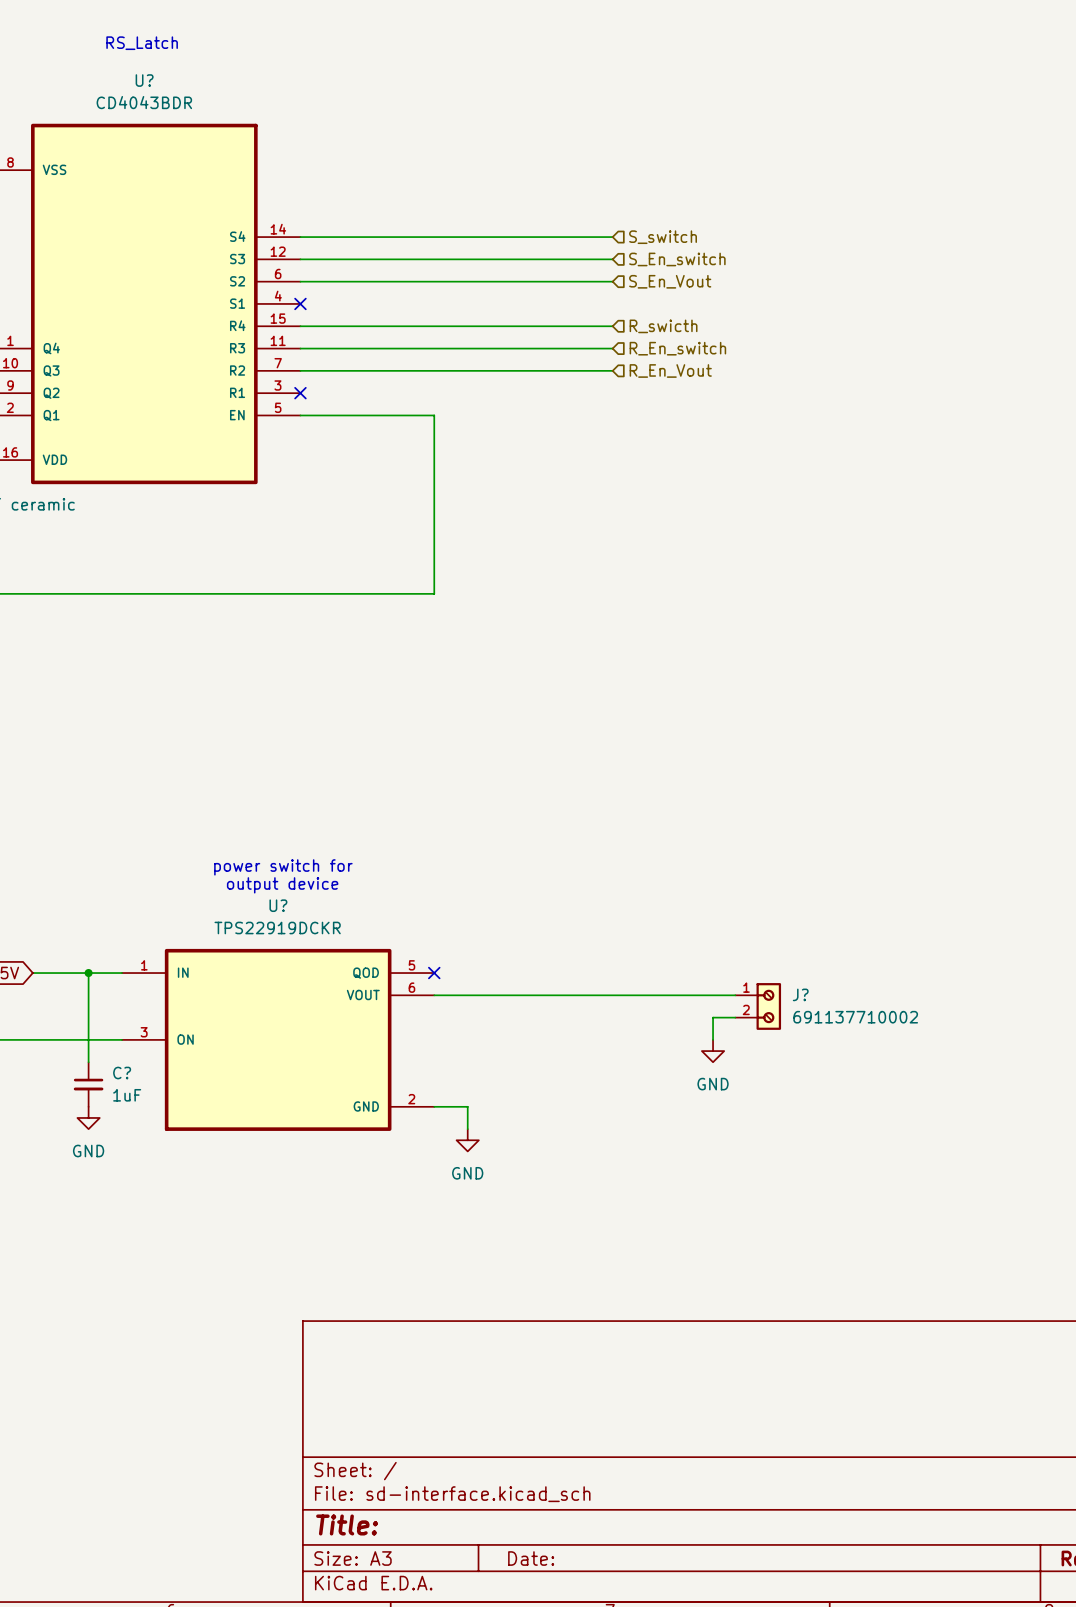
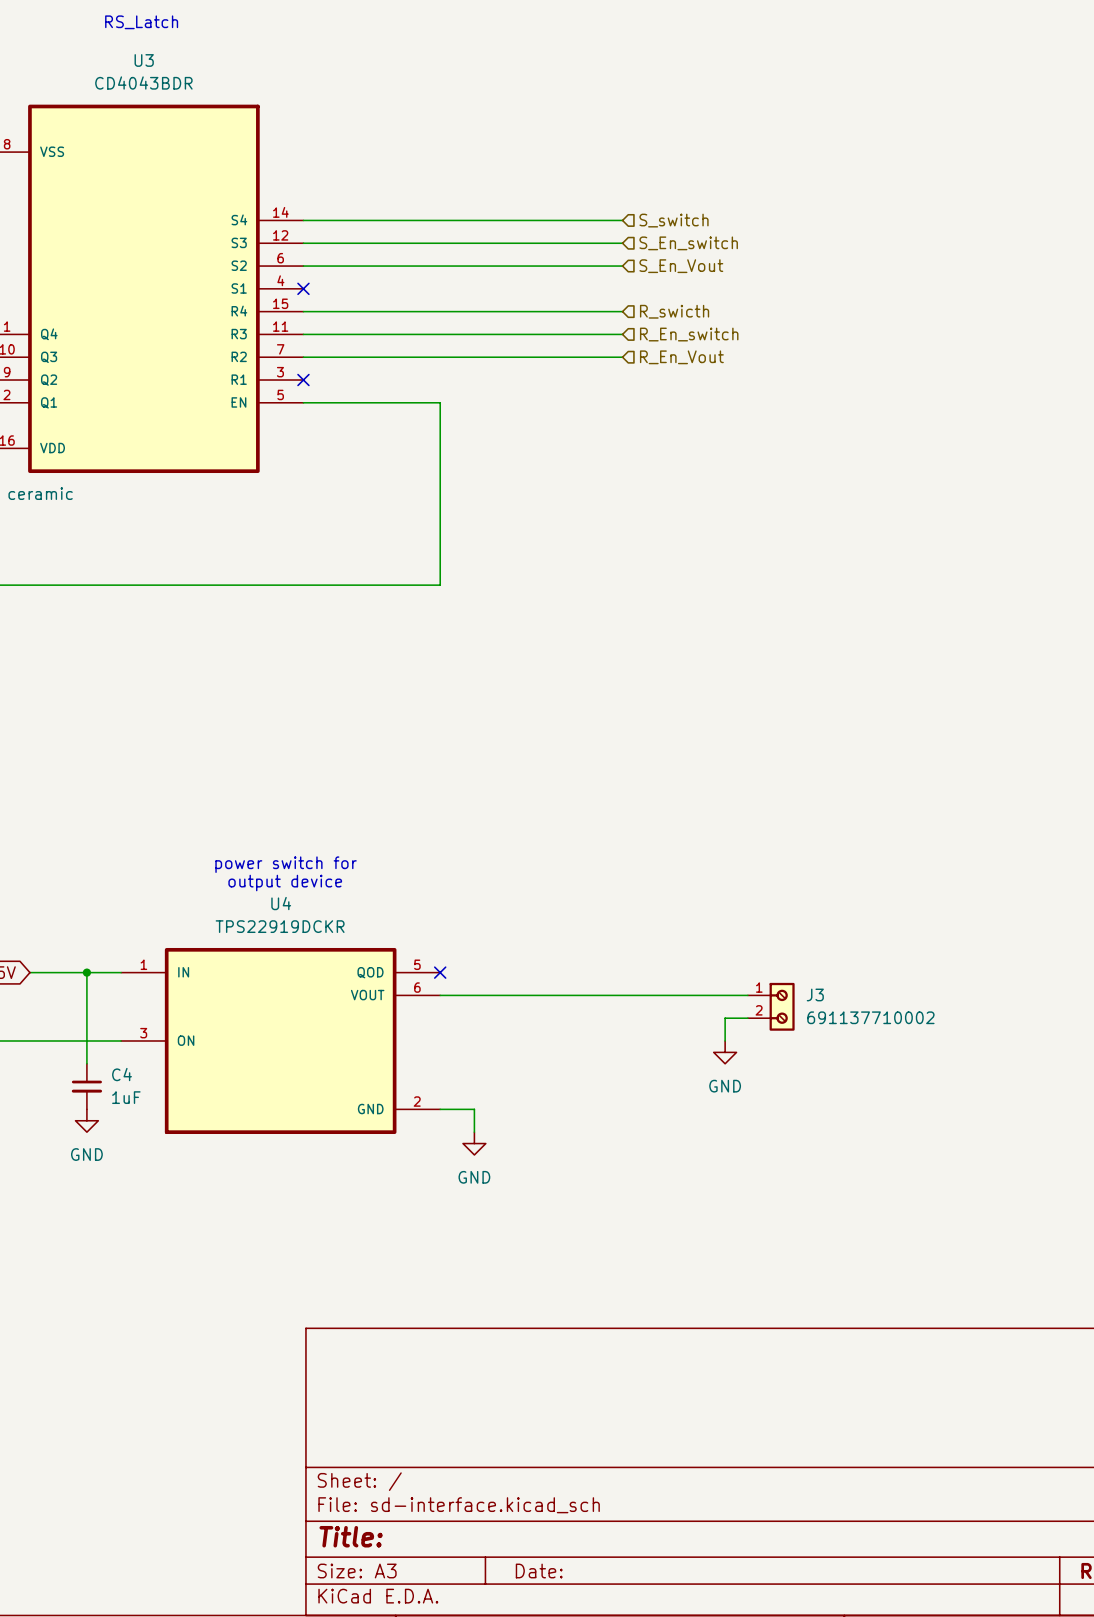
U? name: U? (144, 80) -> U3 (144, 60)
U? name: U? (278, 905) -> U4 (281, 903)
J? name: J? (800, 994) -> J3 (815, 994)
C? name: C? (122, 1073) -> C4 (122, 1074)

